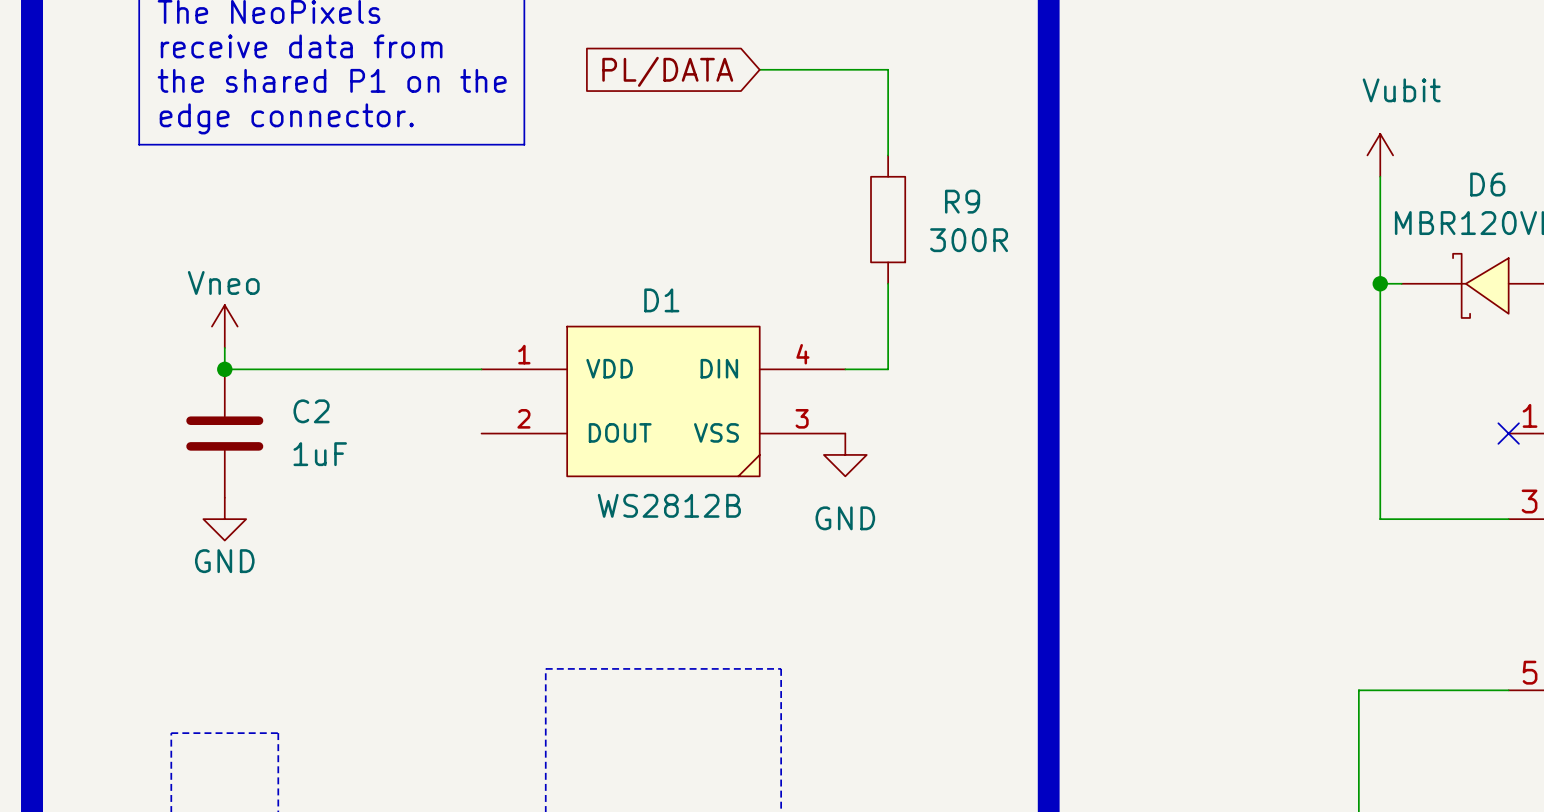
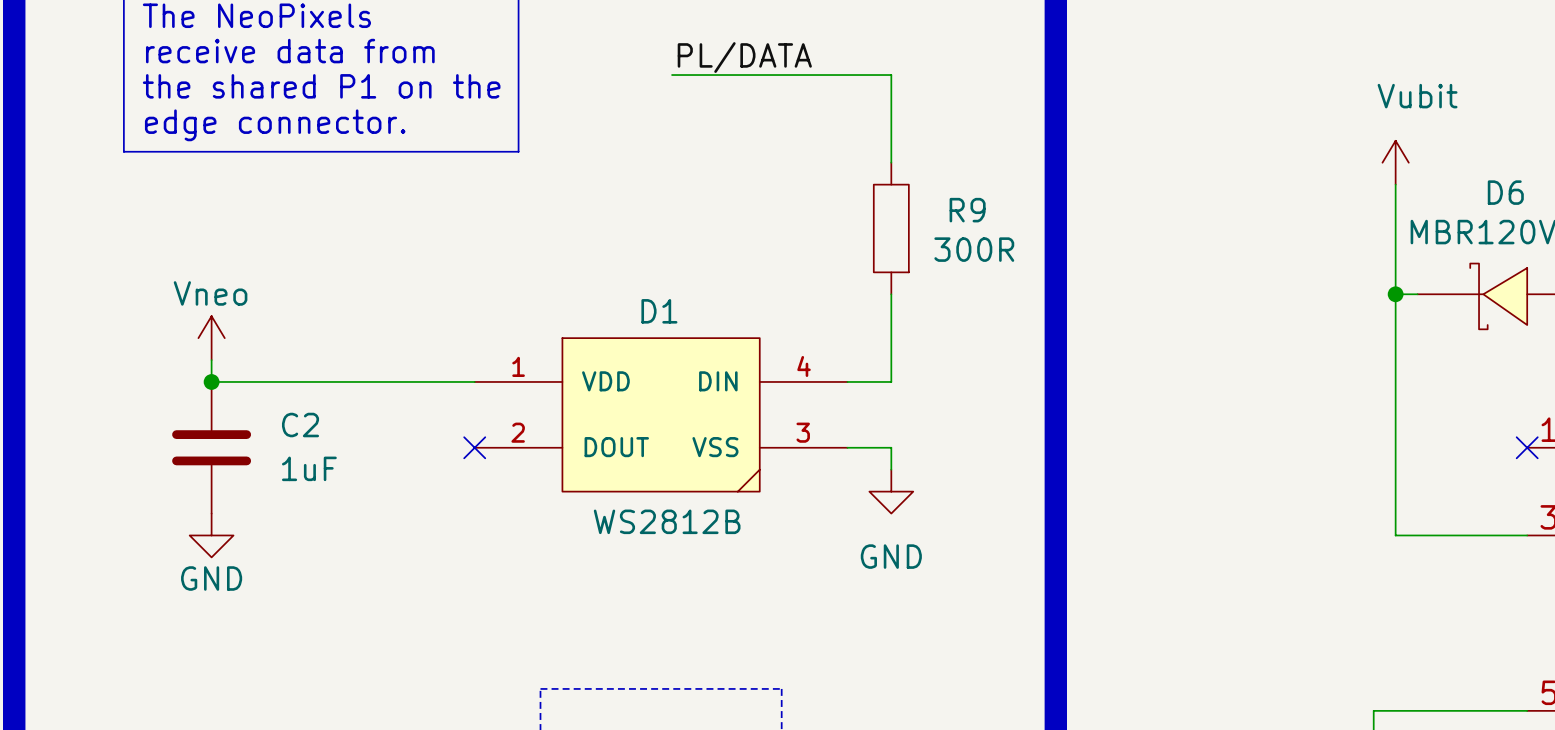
label: none -> PL/DATA (744, 57)
wire: none -> (672, 75) (759, 75)
global label: PL/DATA (667, 71) -> none
no-connect mark: none -> (474, 447)
wire: none -> (847, 447) (891, 447) (891, 469)
power symbol position: GND (845, 454) -> GND (891, 491)

